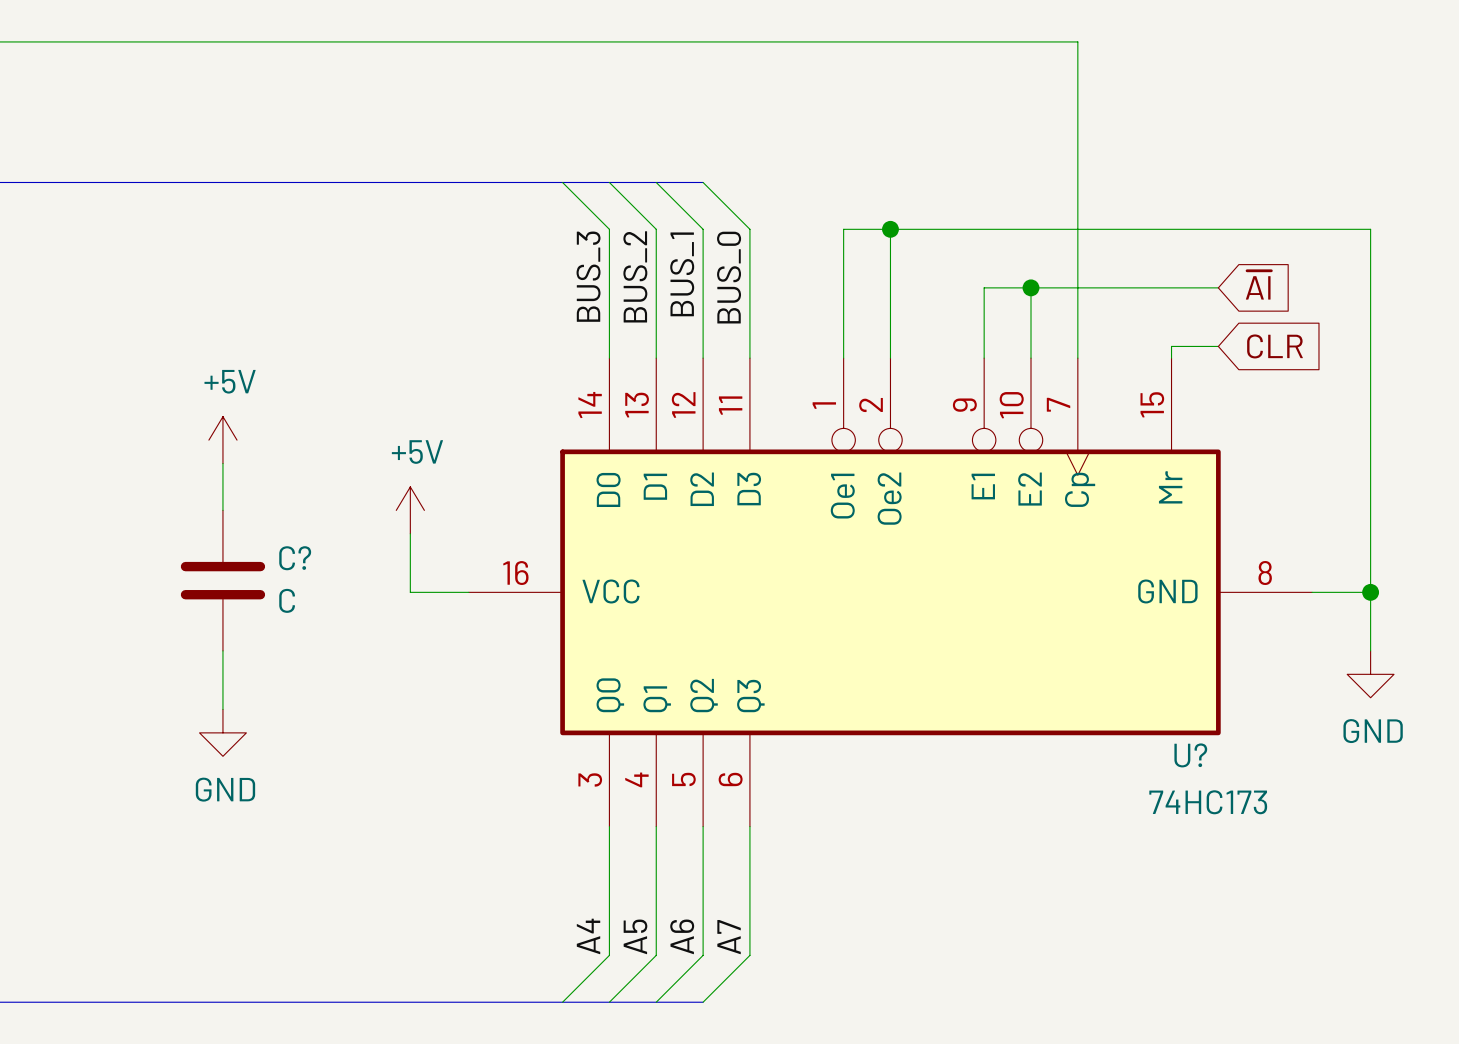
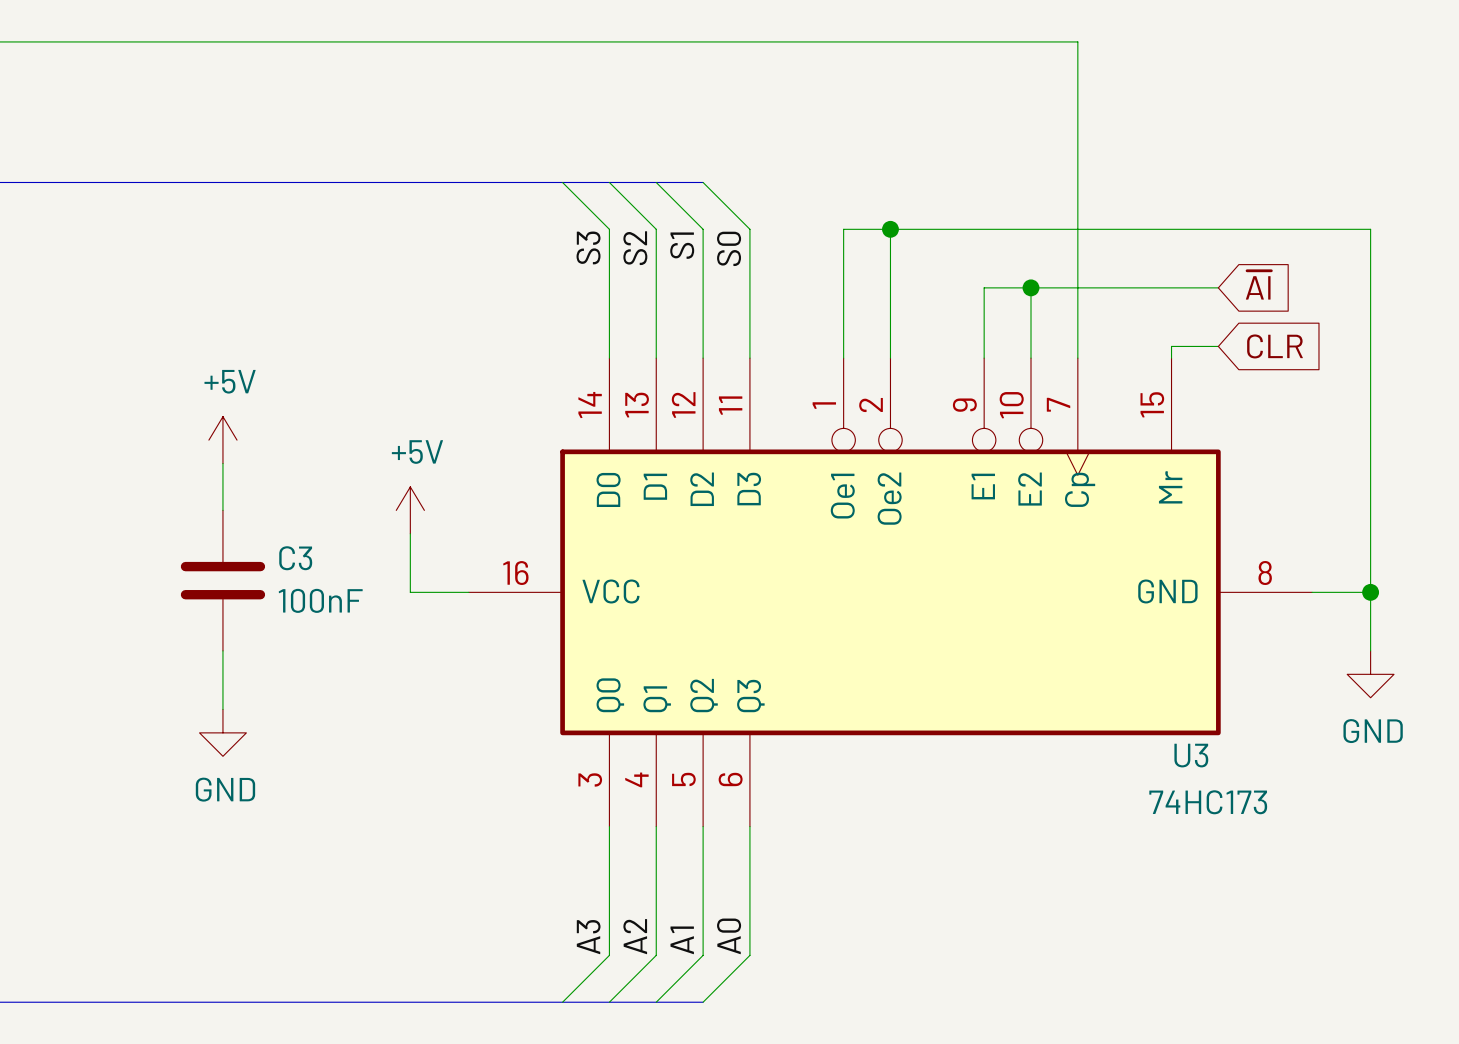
label: BUS_1 (682, 274) -> S1 (682, 245)
label: BUS_3 (588, 276) -> S3 (588, 247)
label: BUS_2 (635, 276) -> S2 (635, 248)
label: BUS_0 (729, 277) -> S0 (729, 248)
C? name: C? (295, 558) -> C3 (295, 558)
C? value: C (287, 600) -> 100nF (320, 600)
U? name: U? (1190, 755) -> U3 (1191, 755)
label: A4 (588, 936) -> A3 (588, 937)
label: A5 (635, 936) -> A2 (635, 936)
label: A6 (682, 936) -> A1 (682, 940)
label: A7 (729, 937) -> A0 (729, 936)

